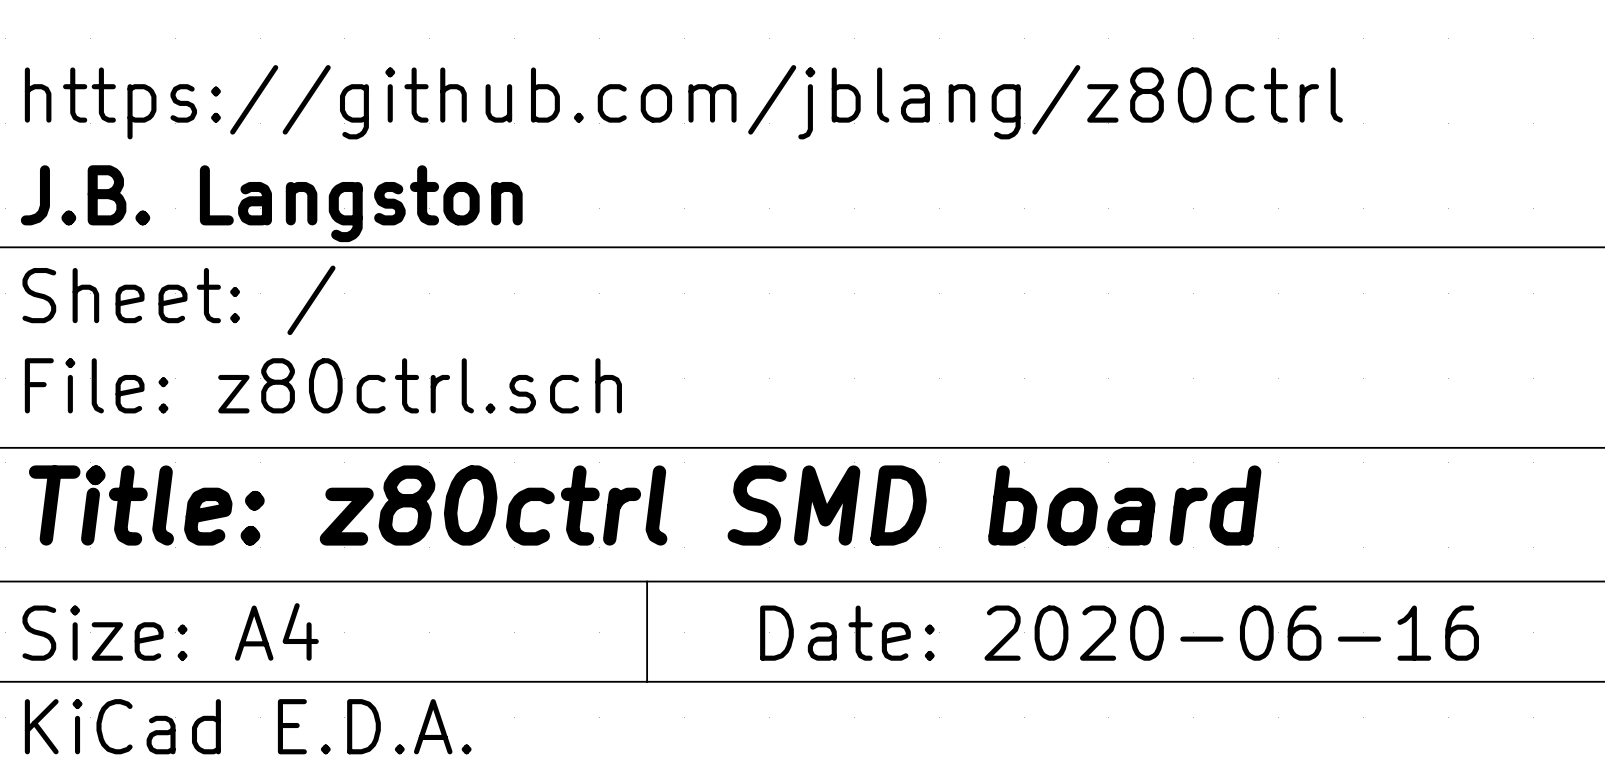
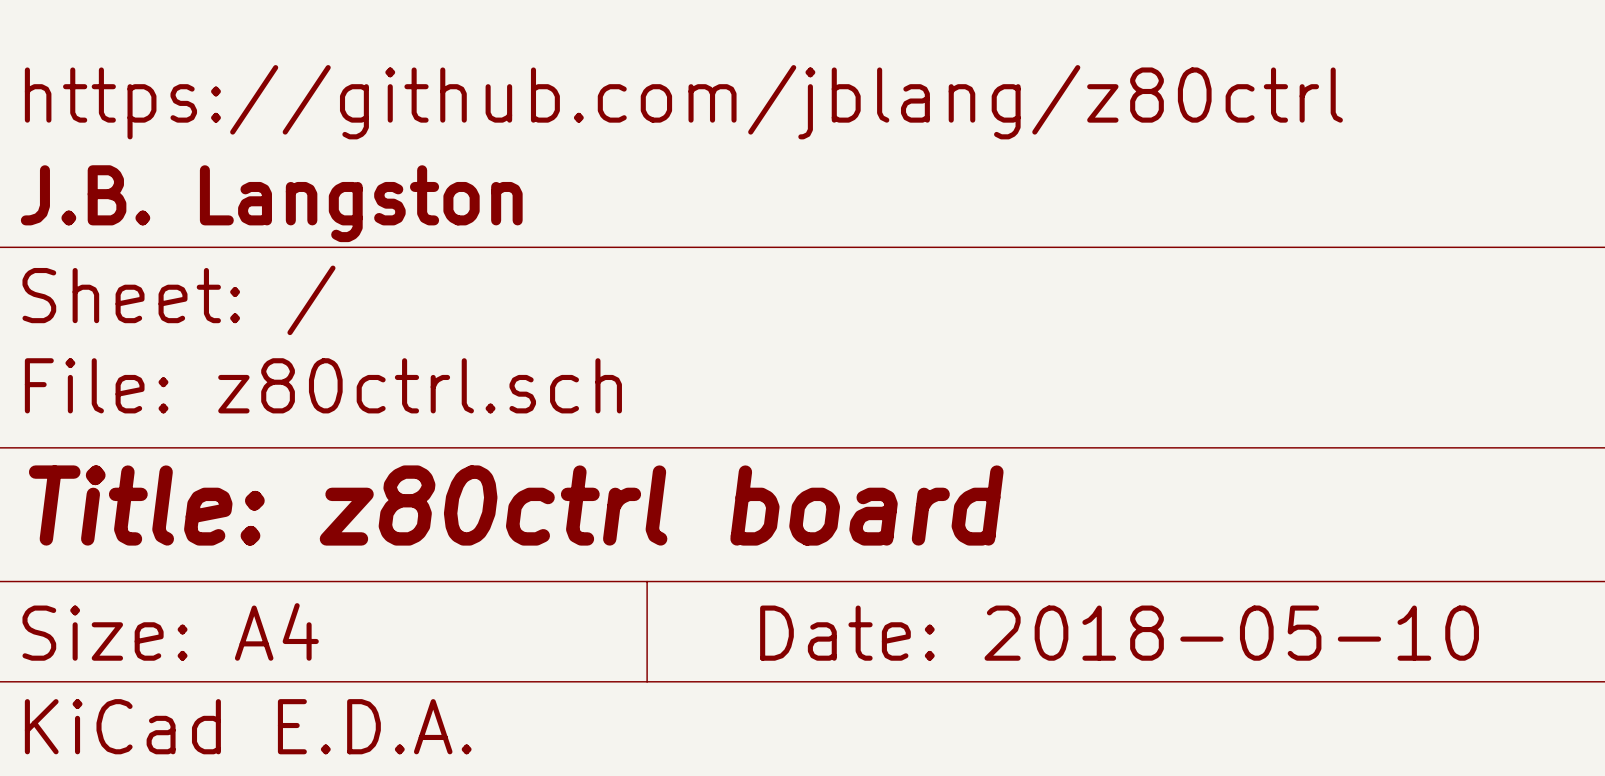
title block: Title: z80ctrl SMD board (645, 505) -> Title: z80ctrl board (516, 505)
title block: Date: 2020-06-16 (1119, 633) -> Date: 2018-05-10 (1119, 633)

